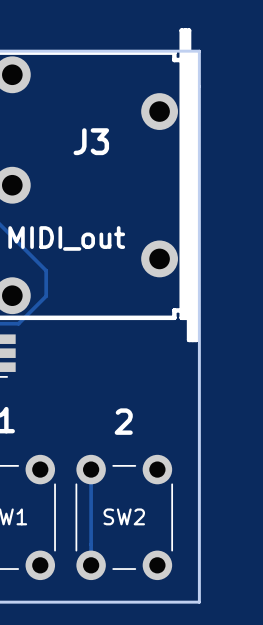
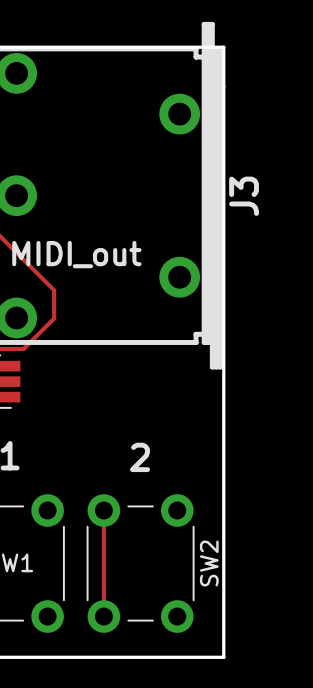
J3 name rotation: 0° (91, 141) -> 90° counterclockwise (244, 196)
J3 name position: J3 (91, 141) -> J3 (244, 196)
SW2 name rotation: 0° (124, 516) -> 90° counterclockwise (209, 563)
SW2 name position: SW2 (124, 516) -> SW2 (209, 563)

